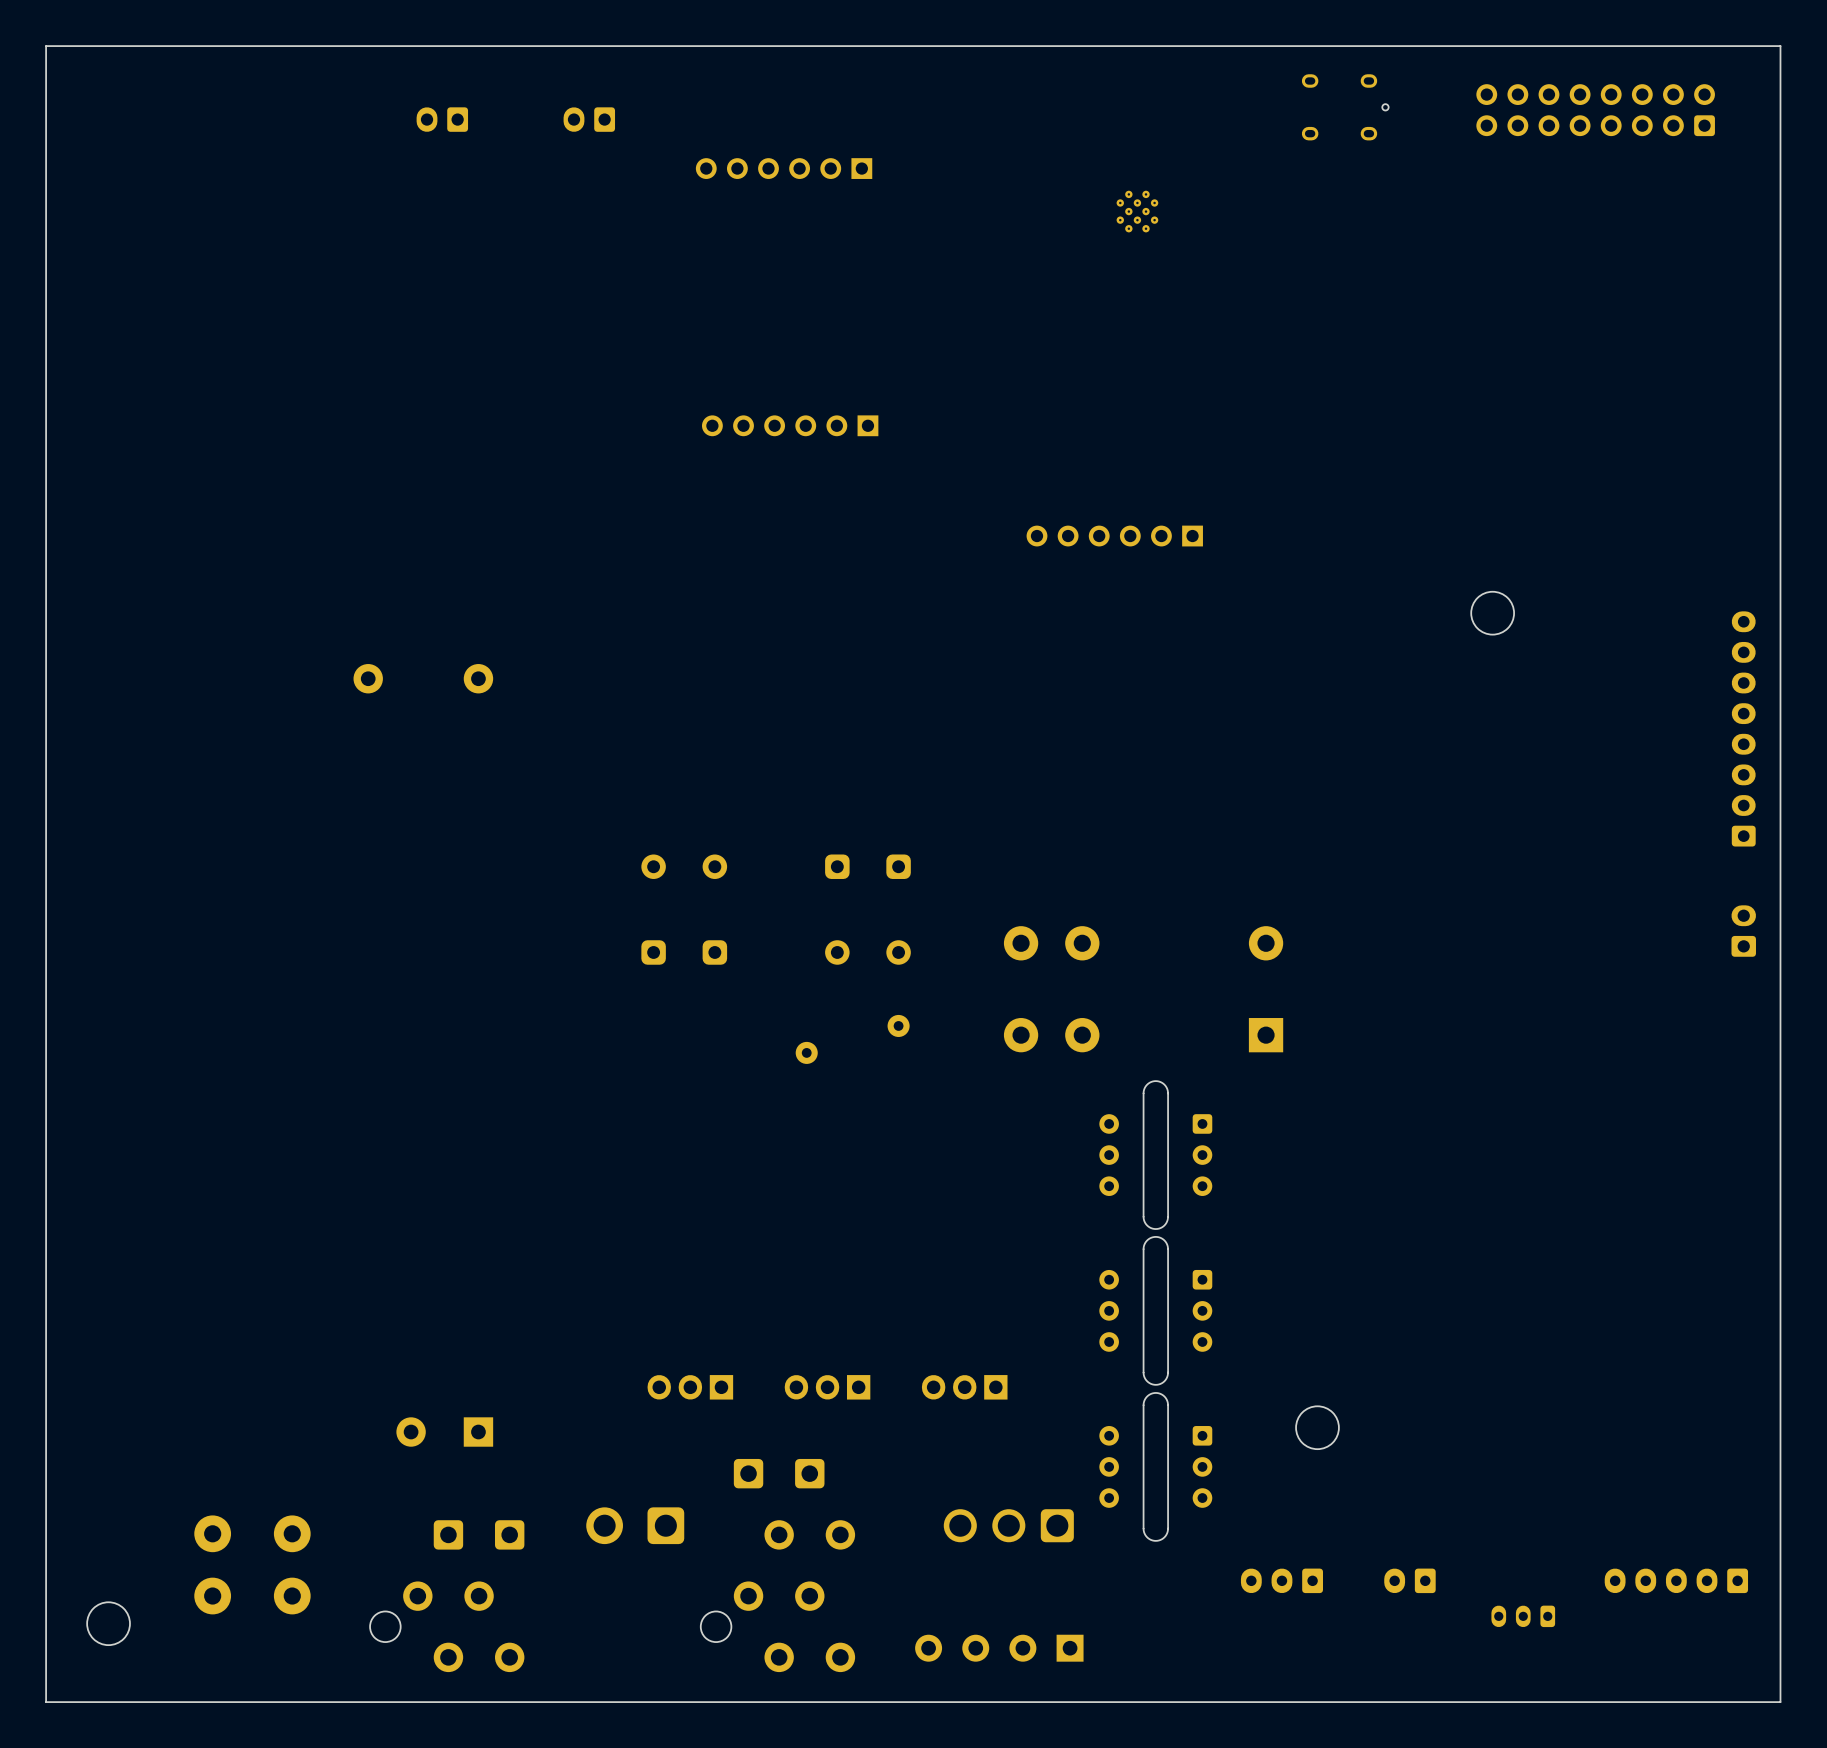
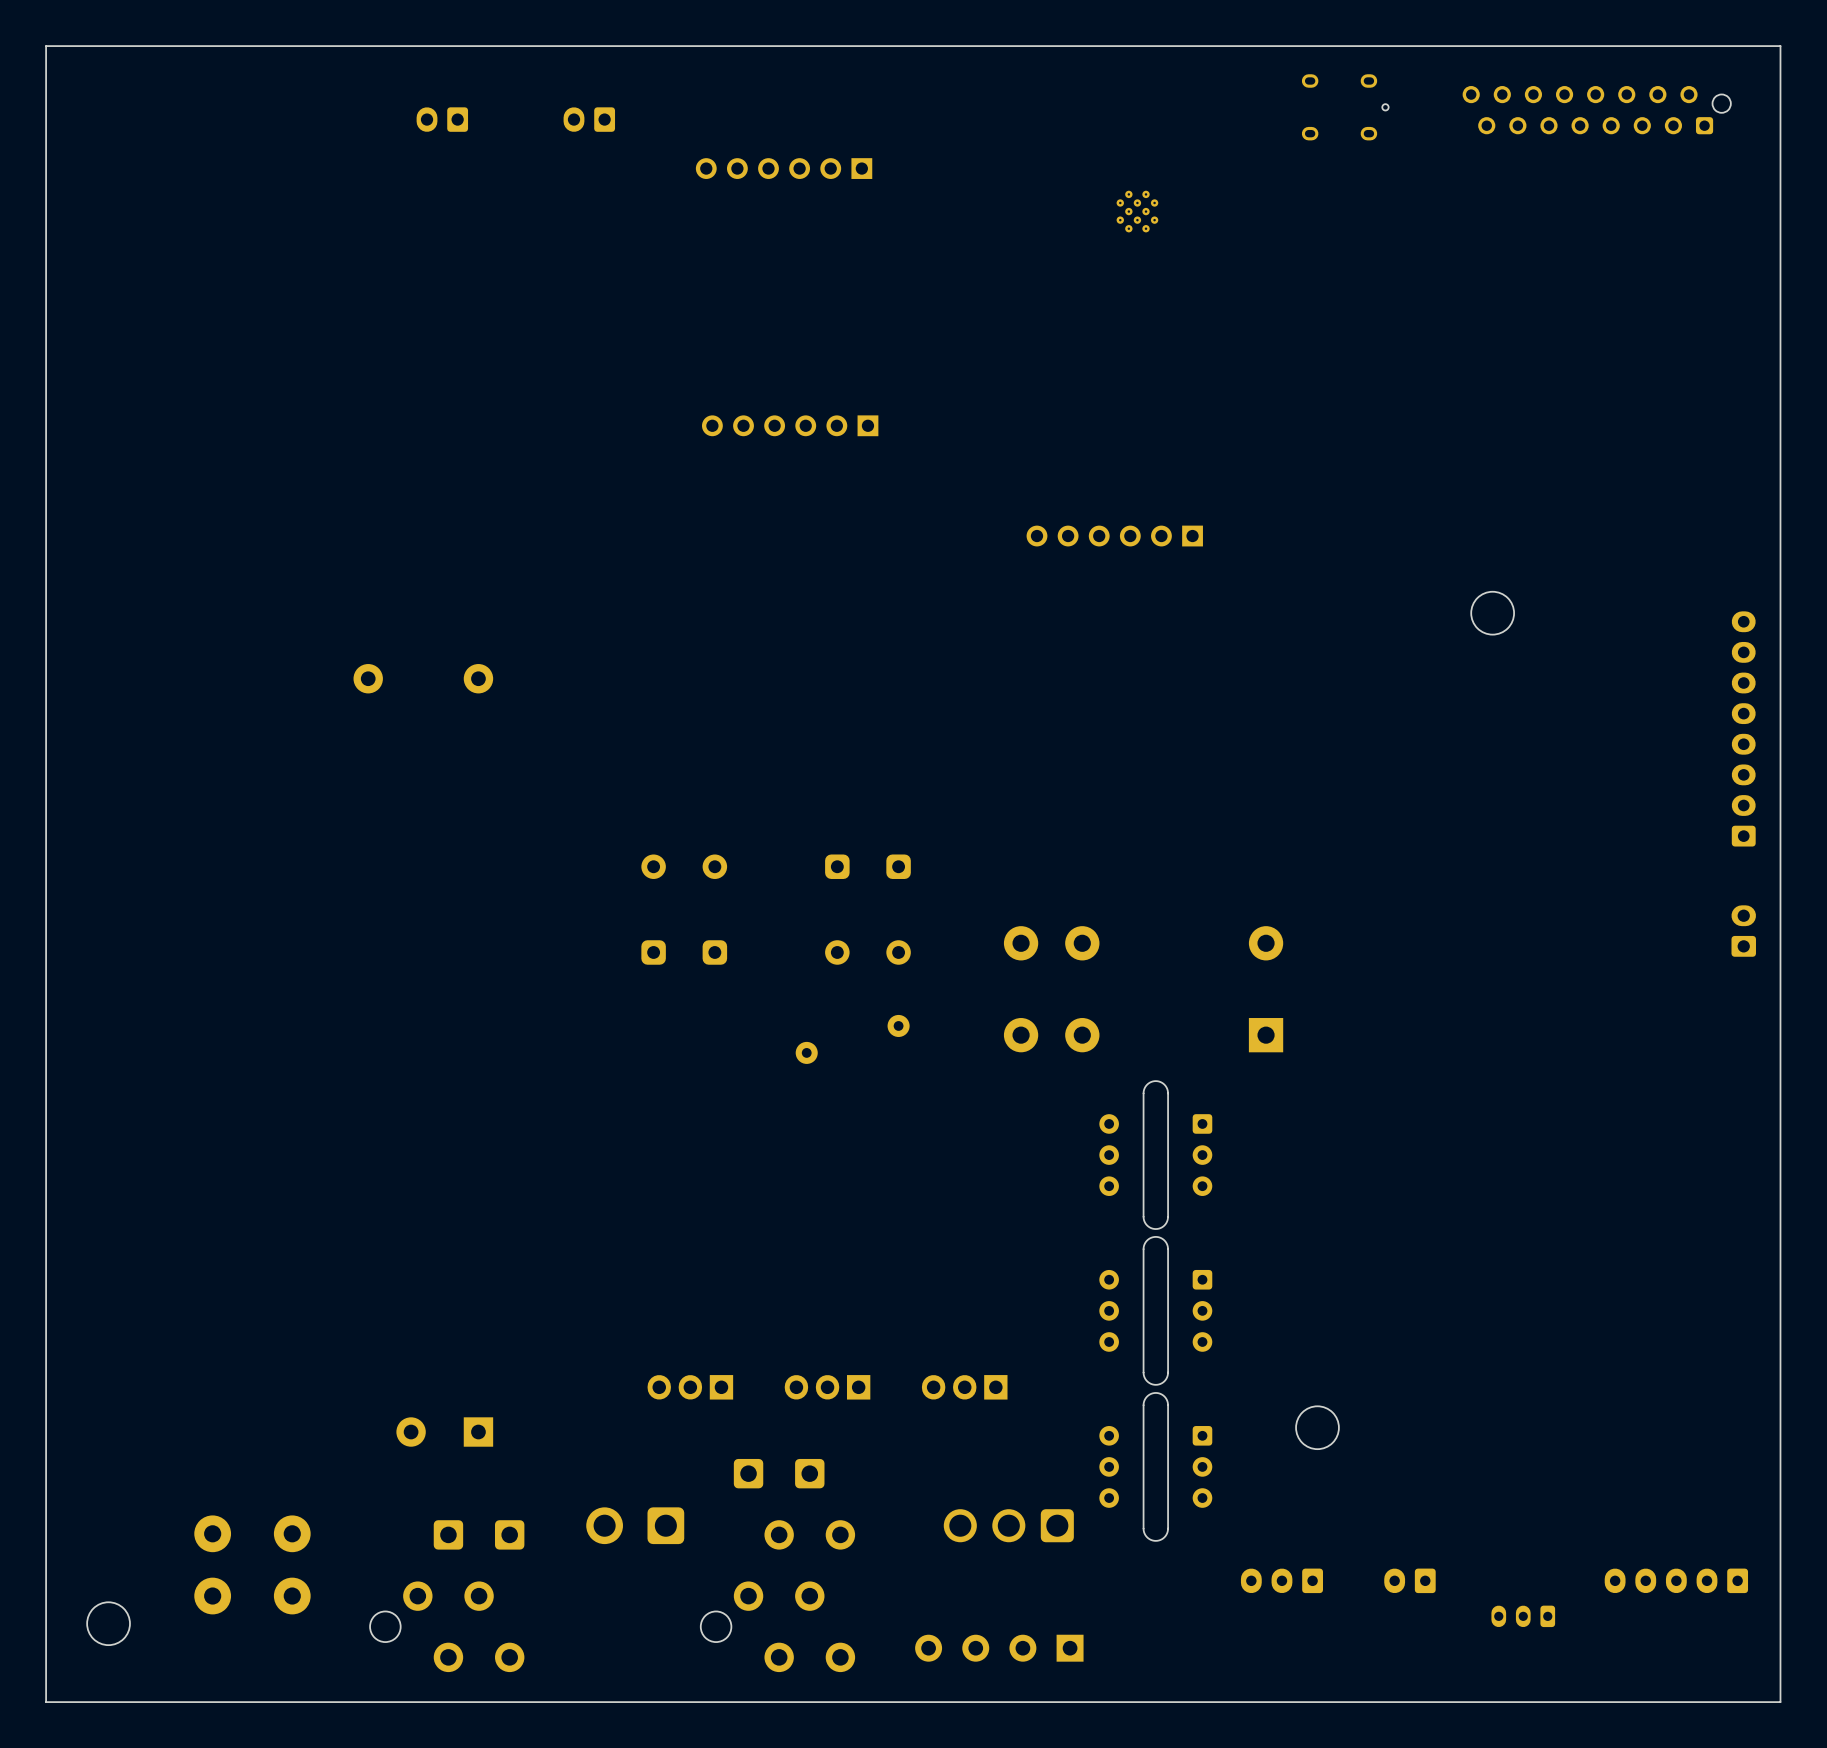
part footprint: [1476, 84, 1715, 137] -> [1462, 86, 1731, 135]

